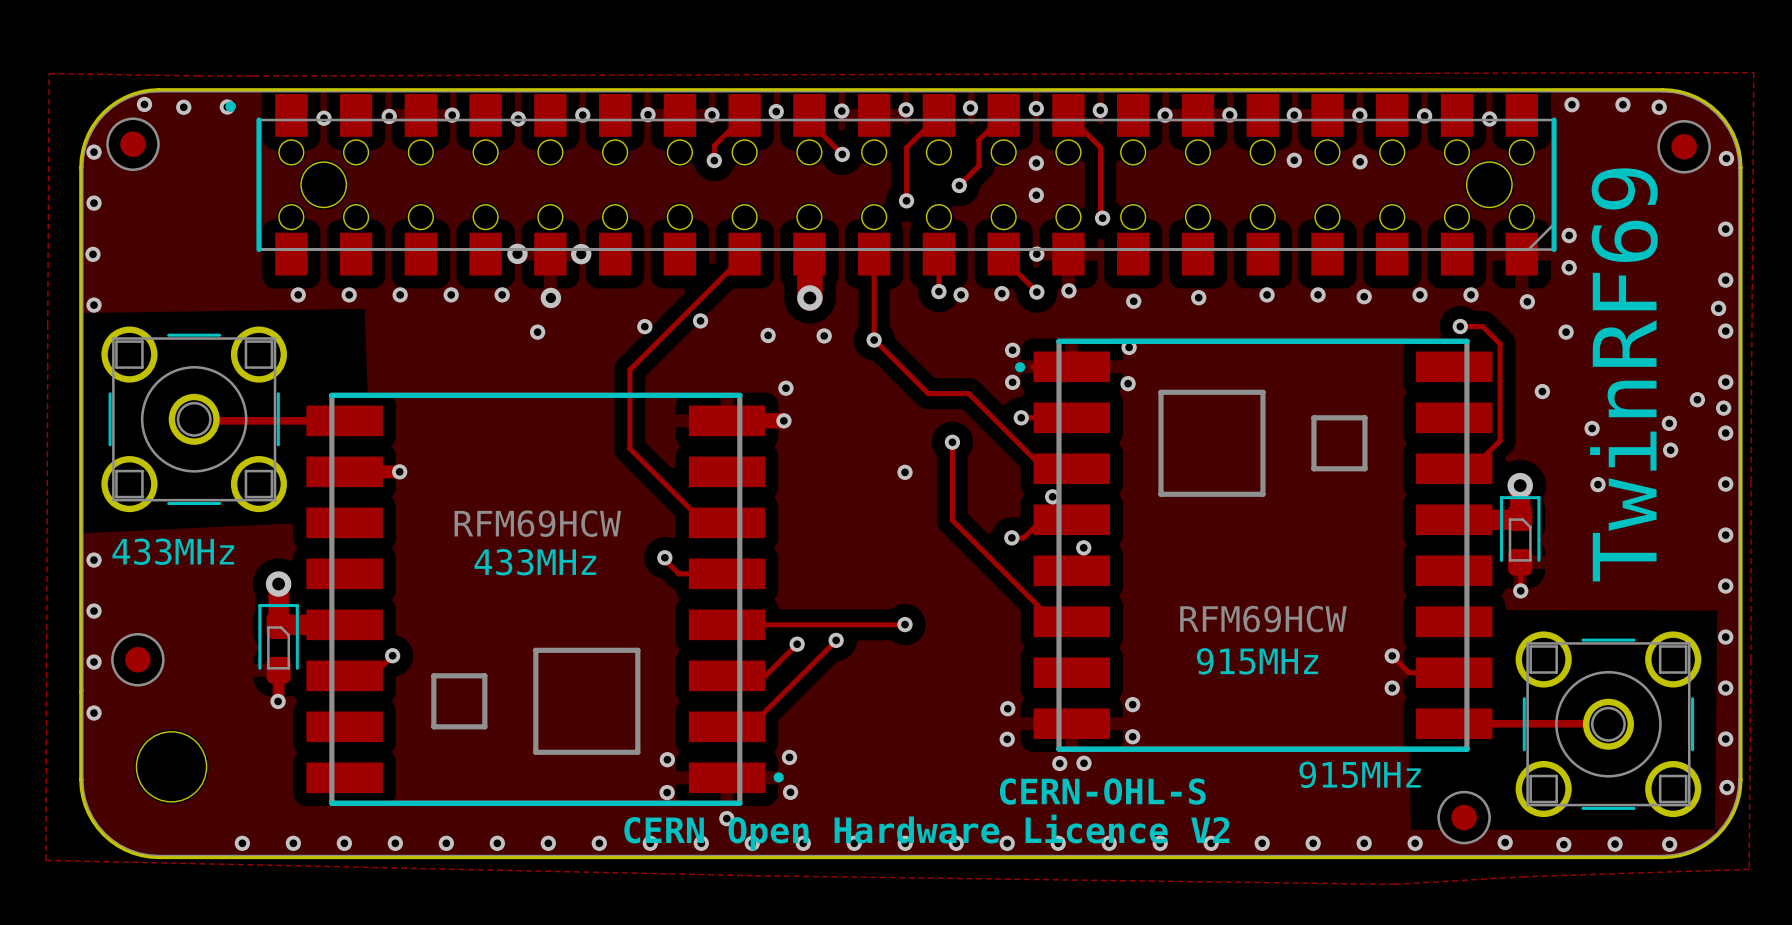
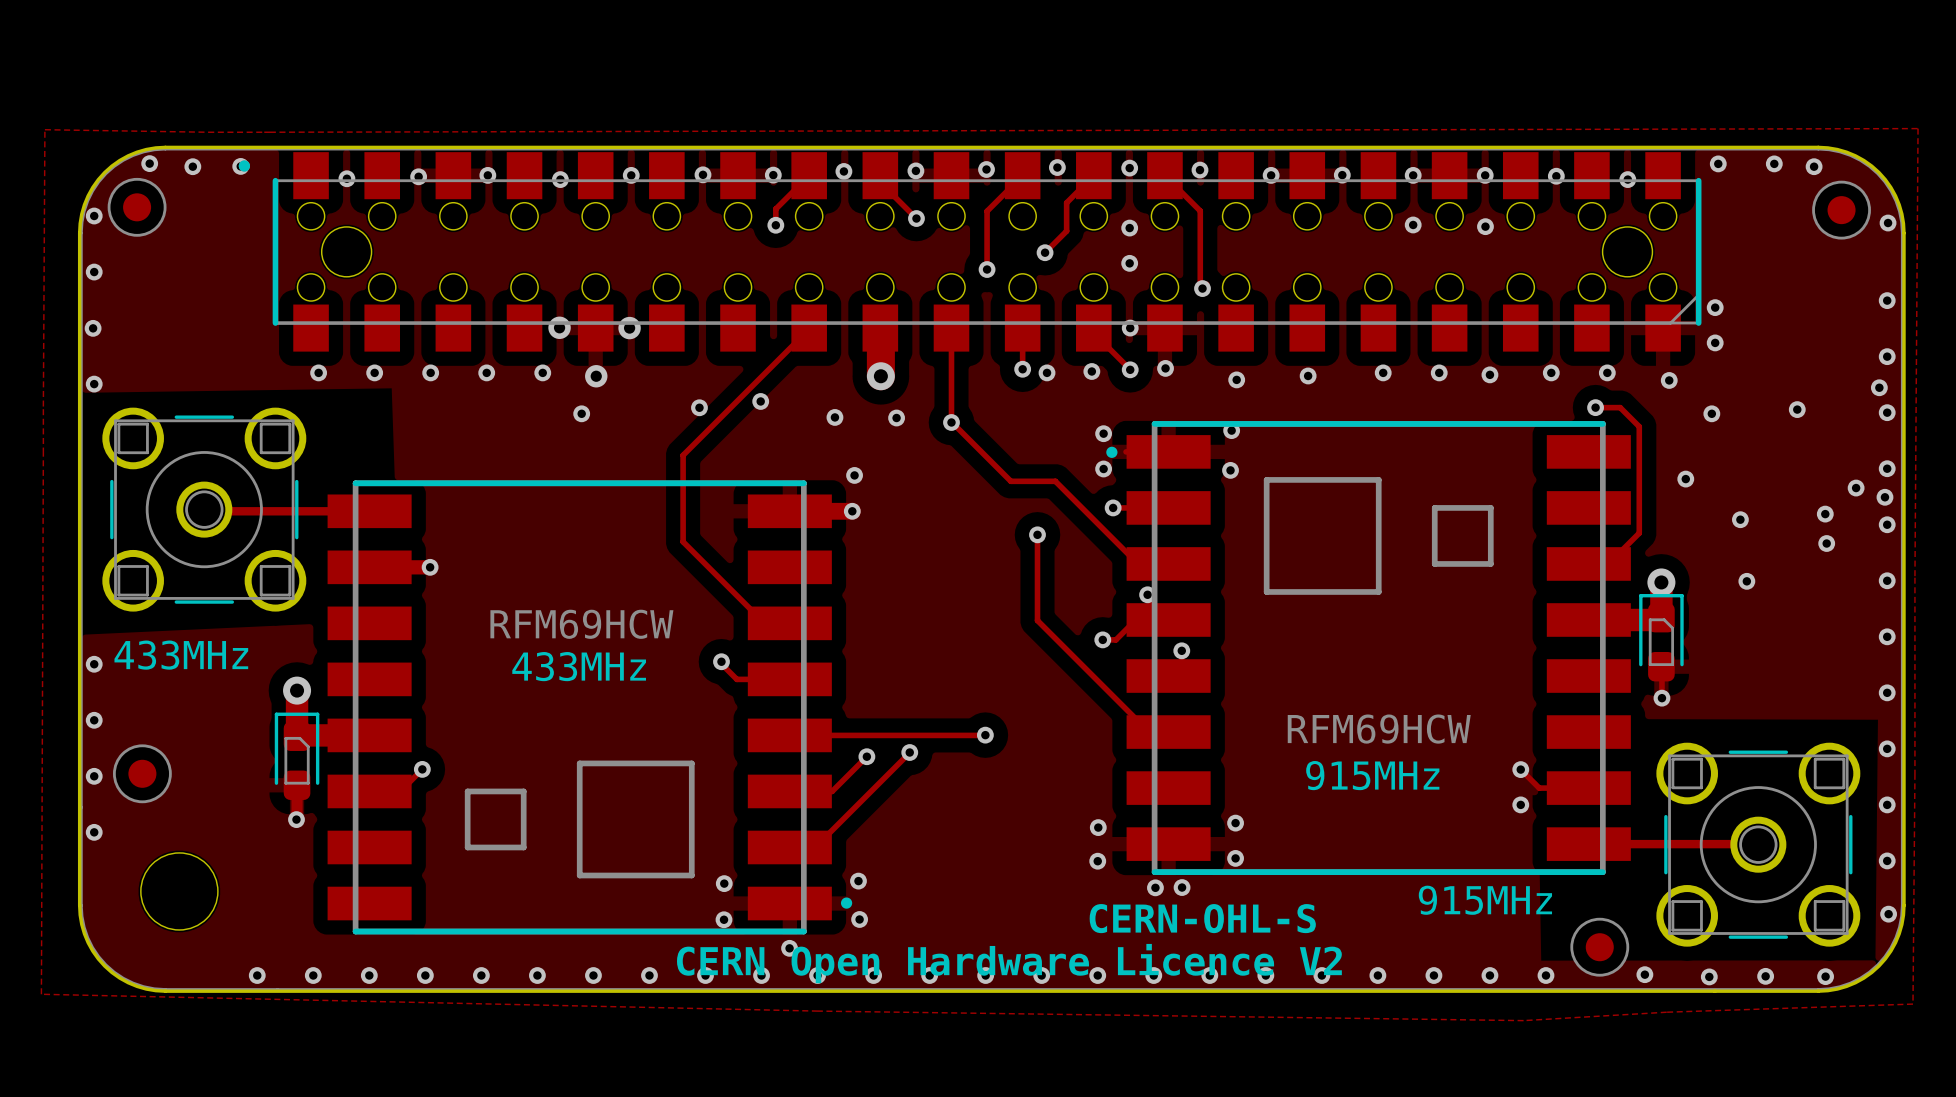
via: none -> (1797, 409)
text: TwinRF69 (1623, 374) -> none
via: (905, 472) -> none

